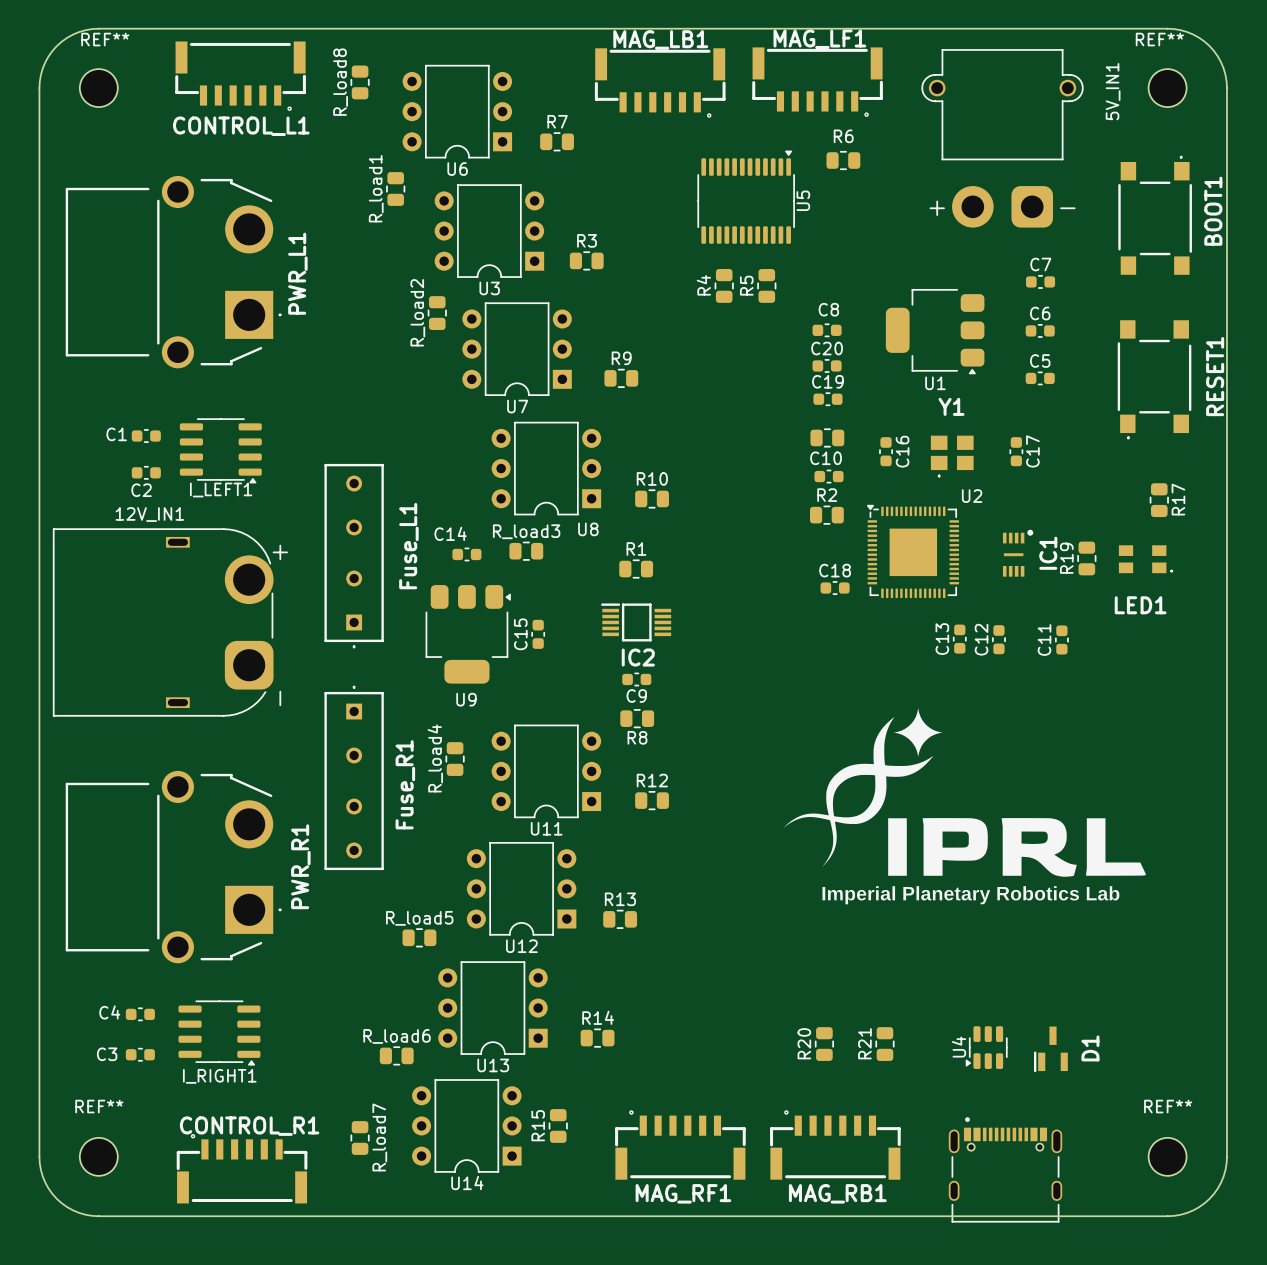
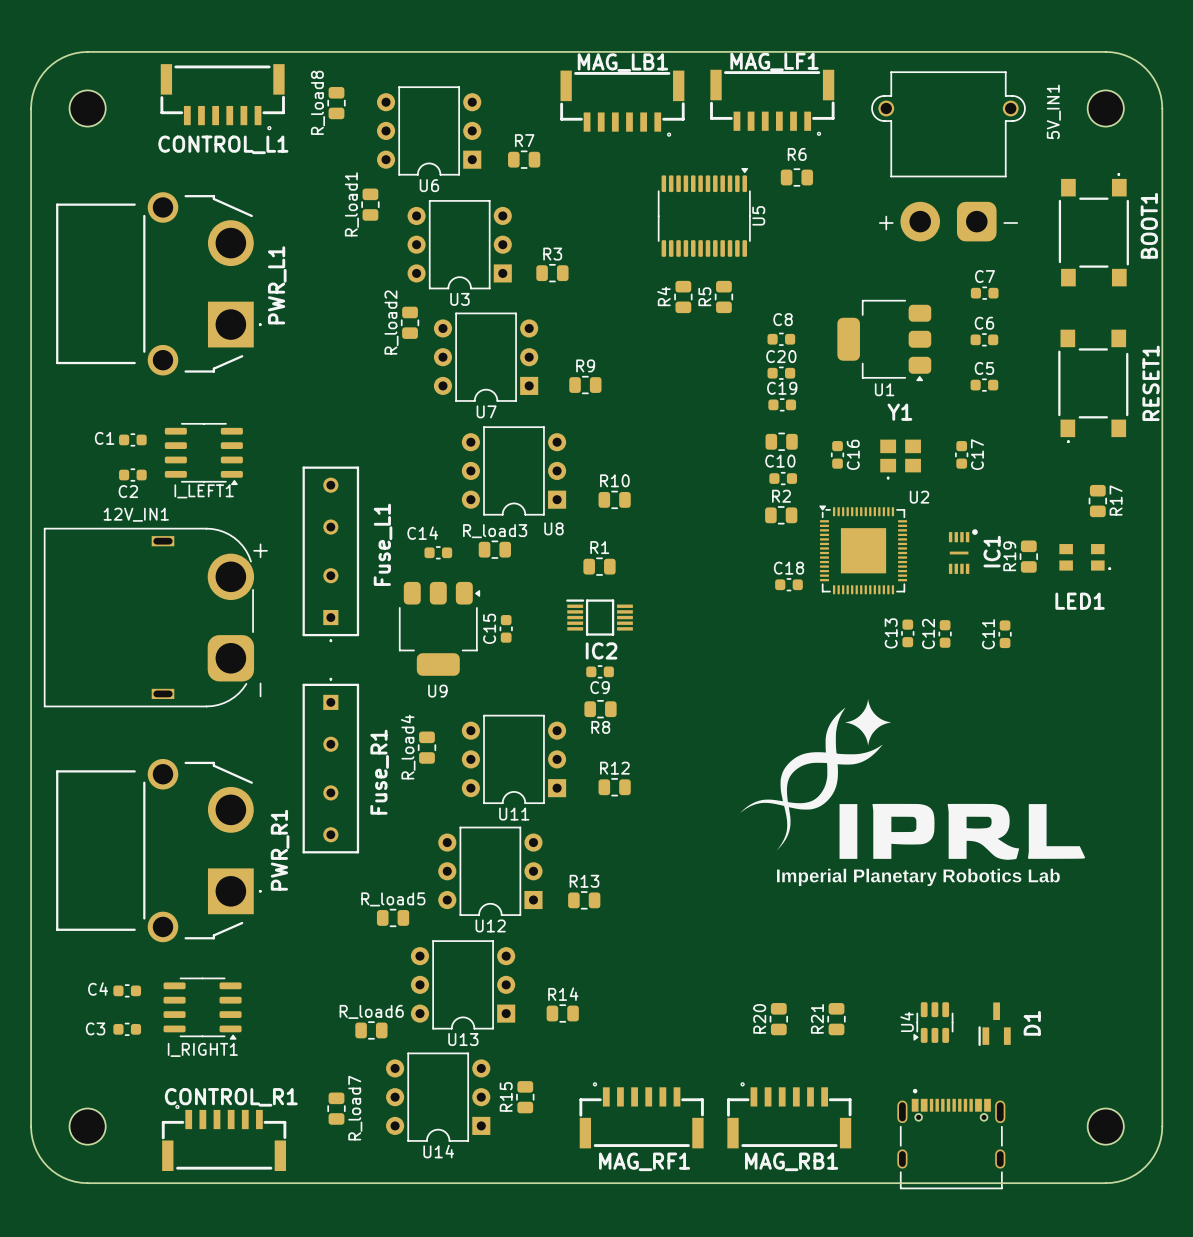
REF** name: REF** (105, 39) -> none
REF** name: REF** (1159, 39) -> none
REF** name: REF** (99, 1106) -> none
REF** name: REF** (1168, 1106) -> none

